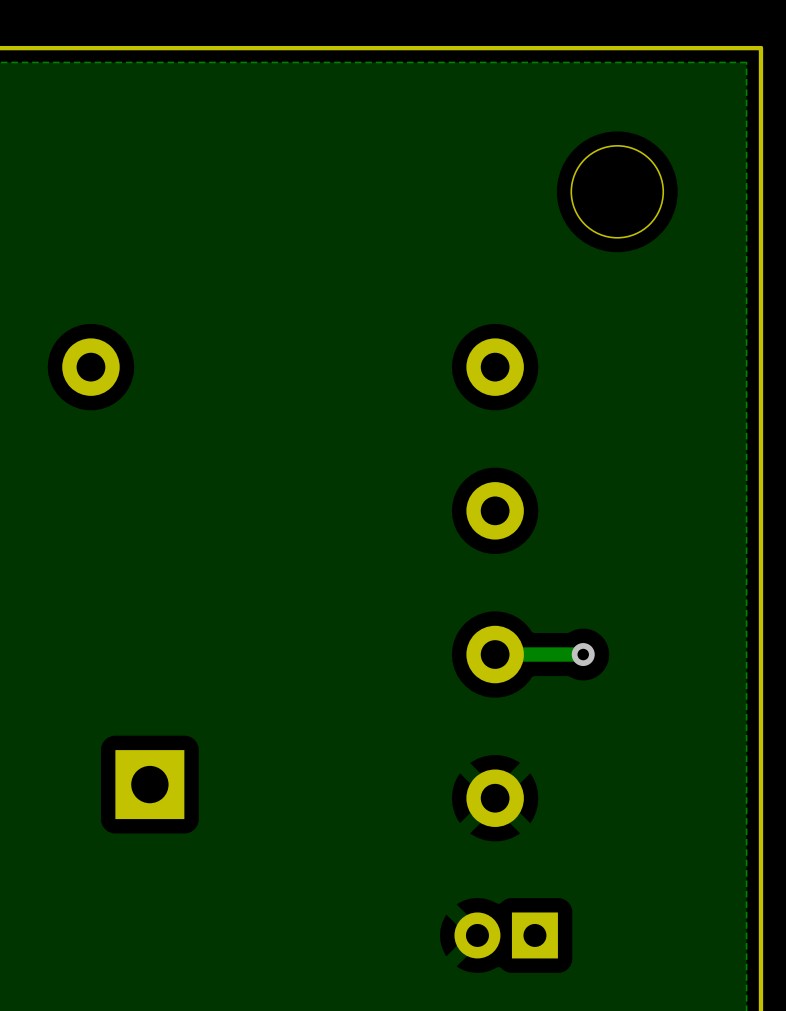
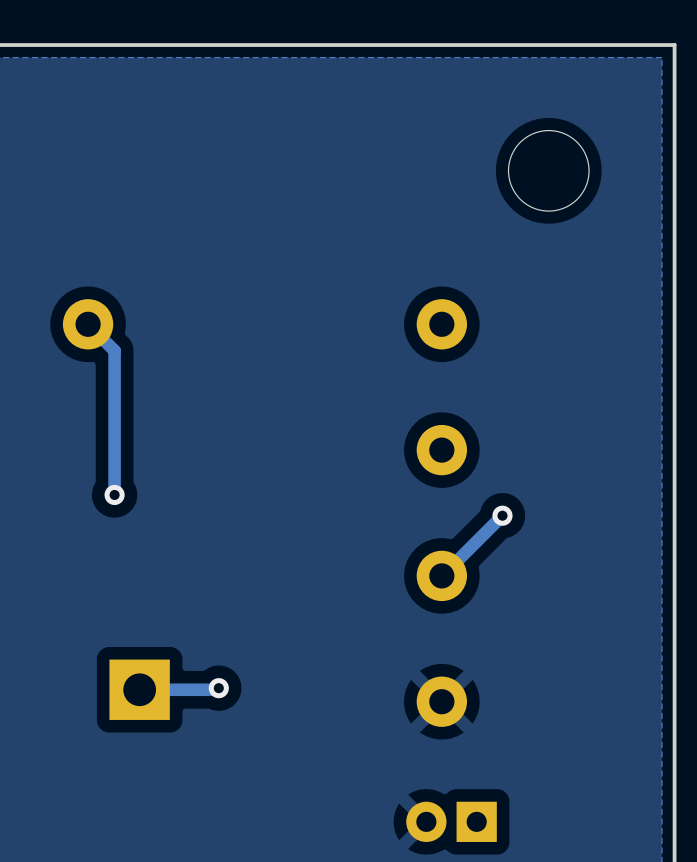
track: none -> (88, 324) (114, 350) (114, 494)
via: none -> (114, 494)
track: (583, 654) (495, 654) -> (502, 515) (442, 575)
via position: (583, 654) -> (502, 515)
track: none -> (218, 688) (217, 689) (139, 689)
via: none -> (218, 688)

